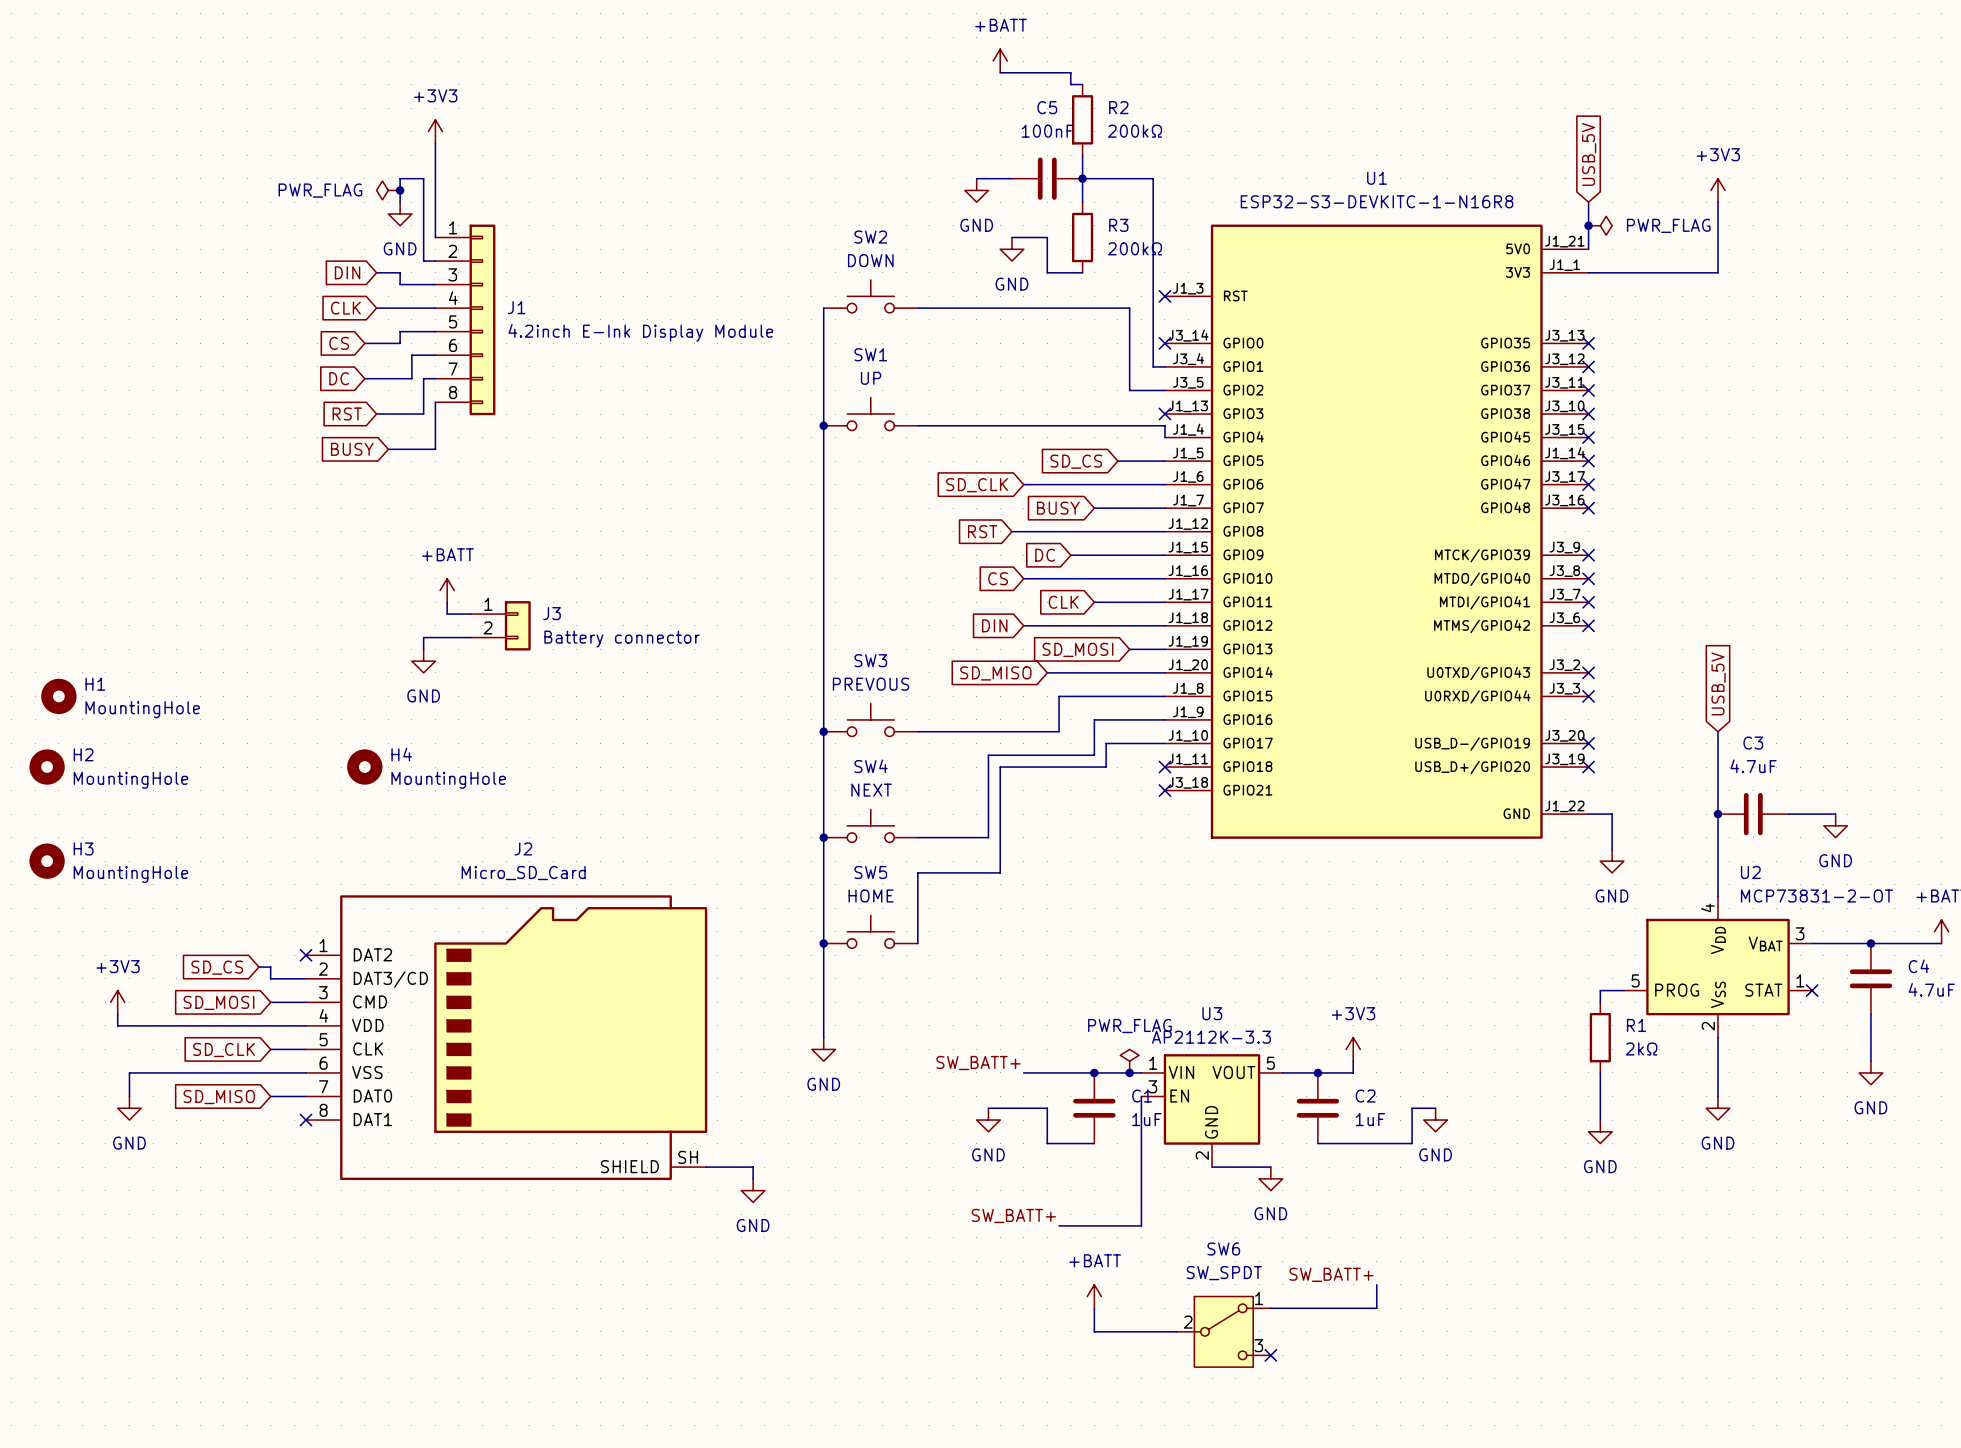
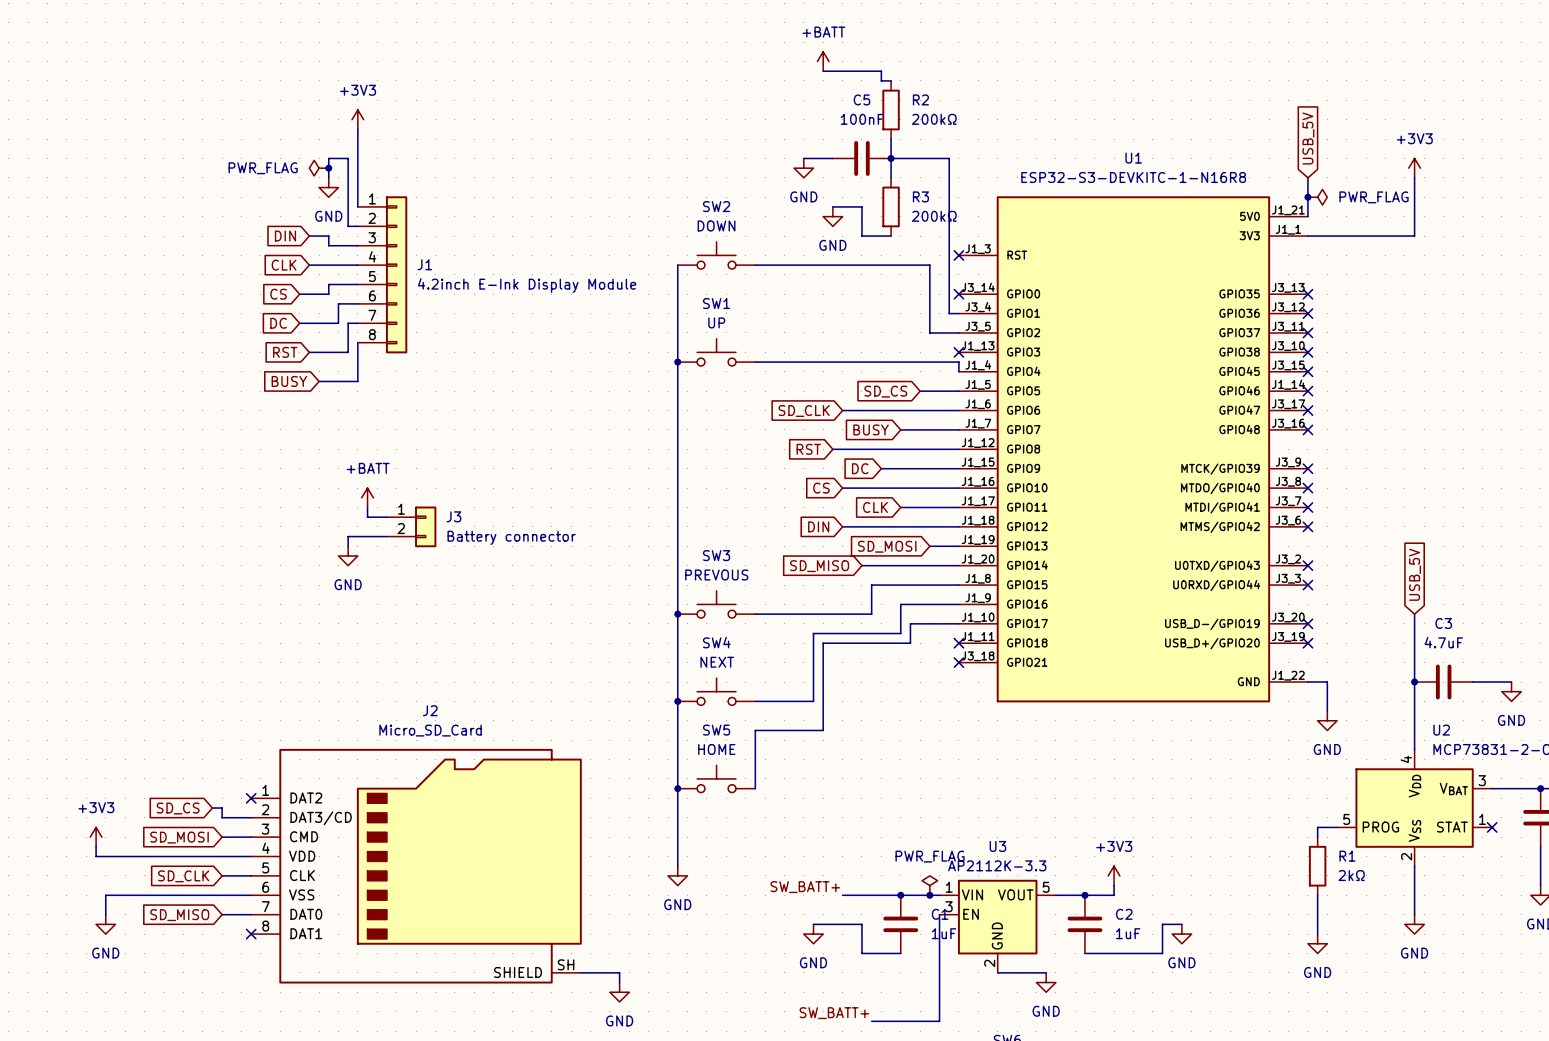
H1: MountingHole (58, 696) -> none
H2: MountingHole (47, 767) -> none
H4: MountingHole (364, 767) -> none
H3: MountingHole (47, 861) -> none

